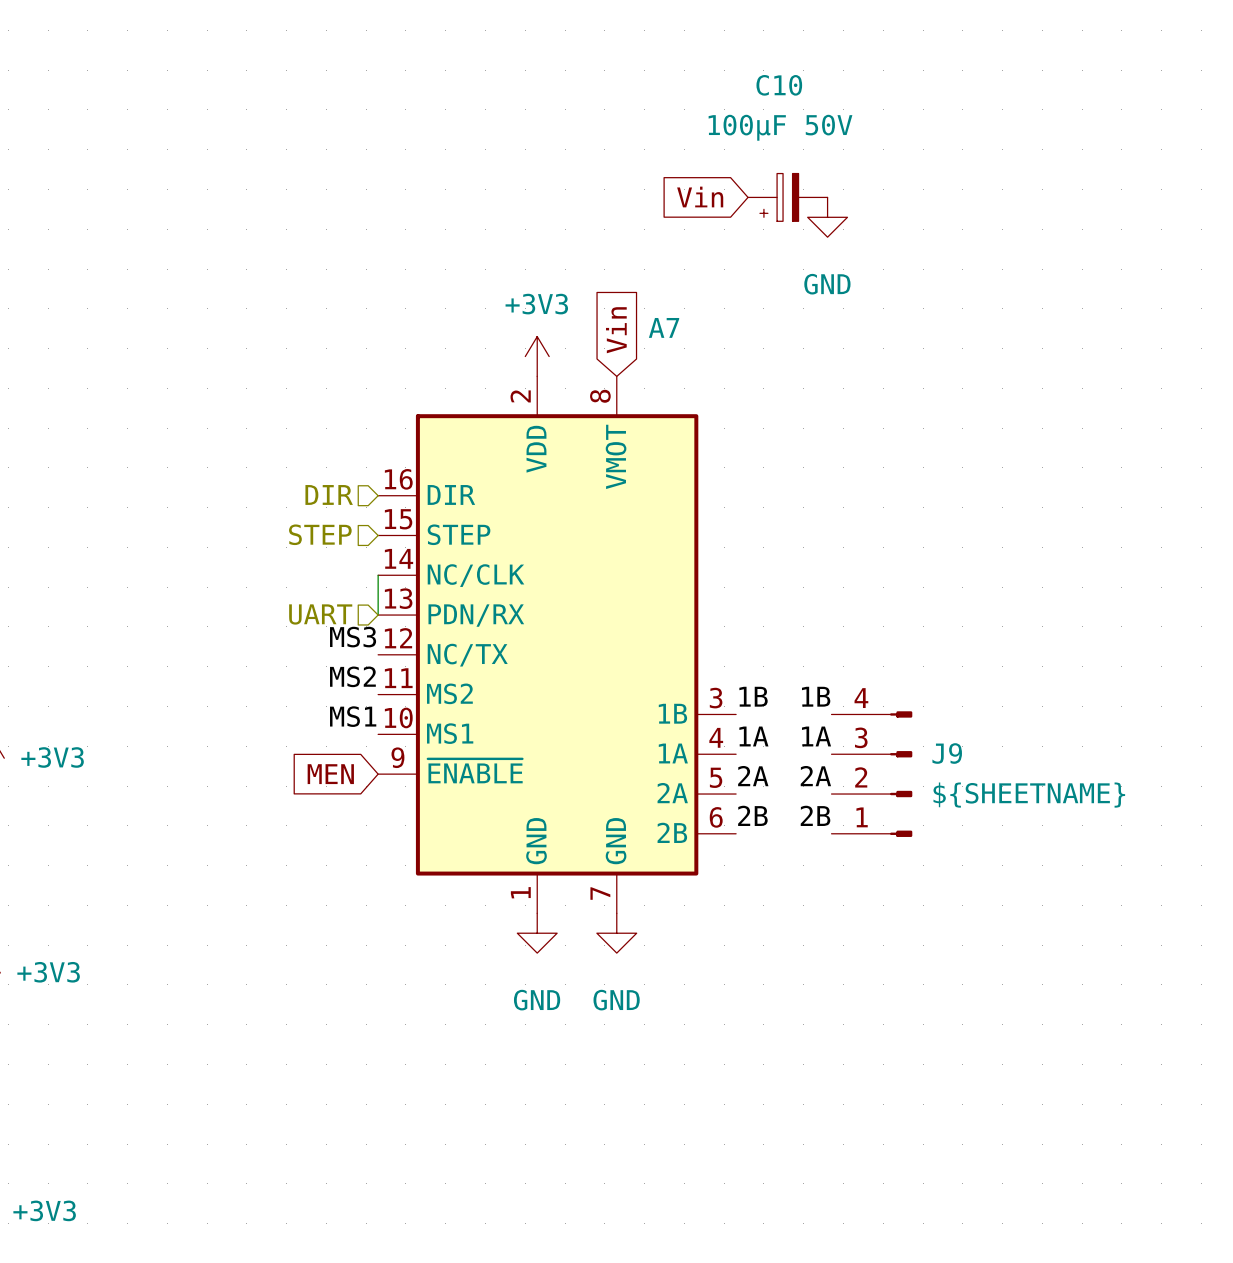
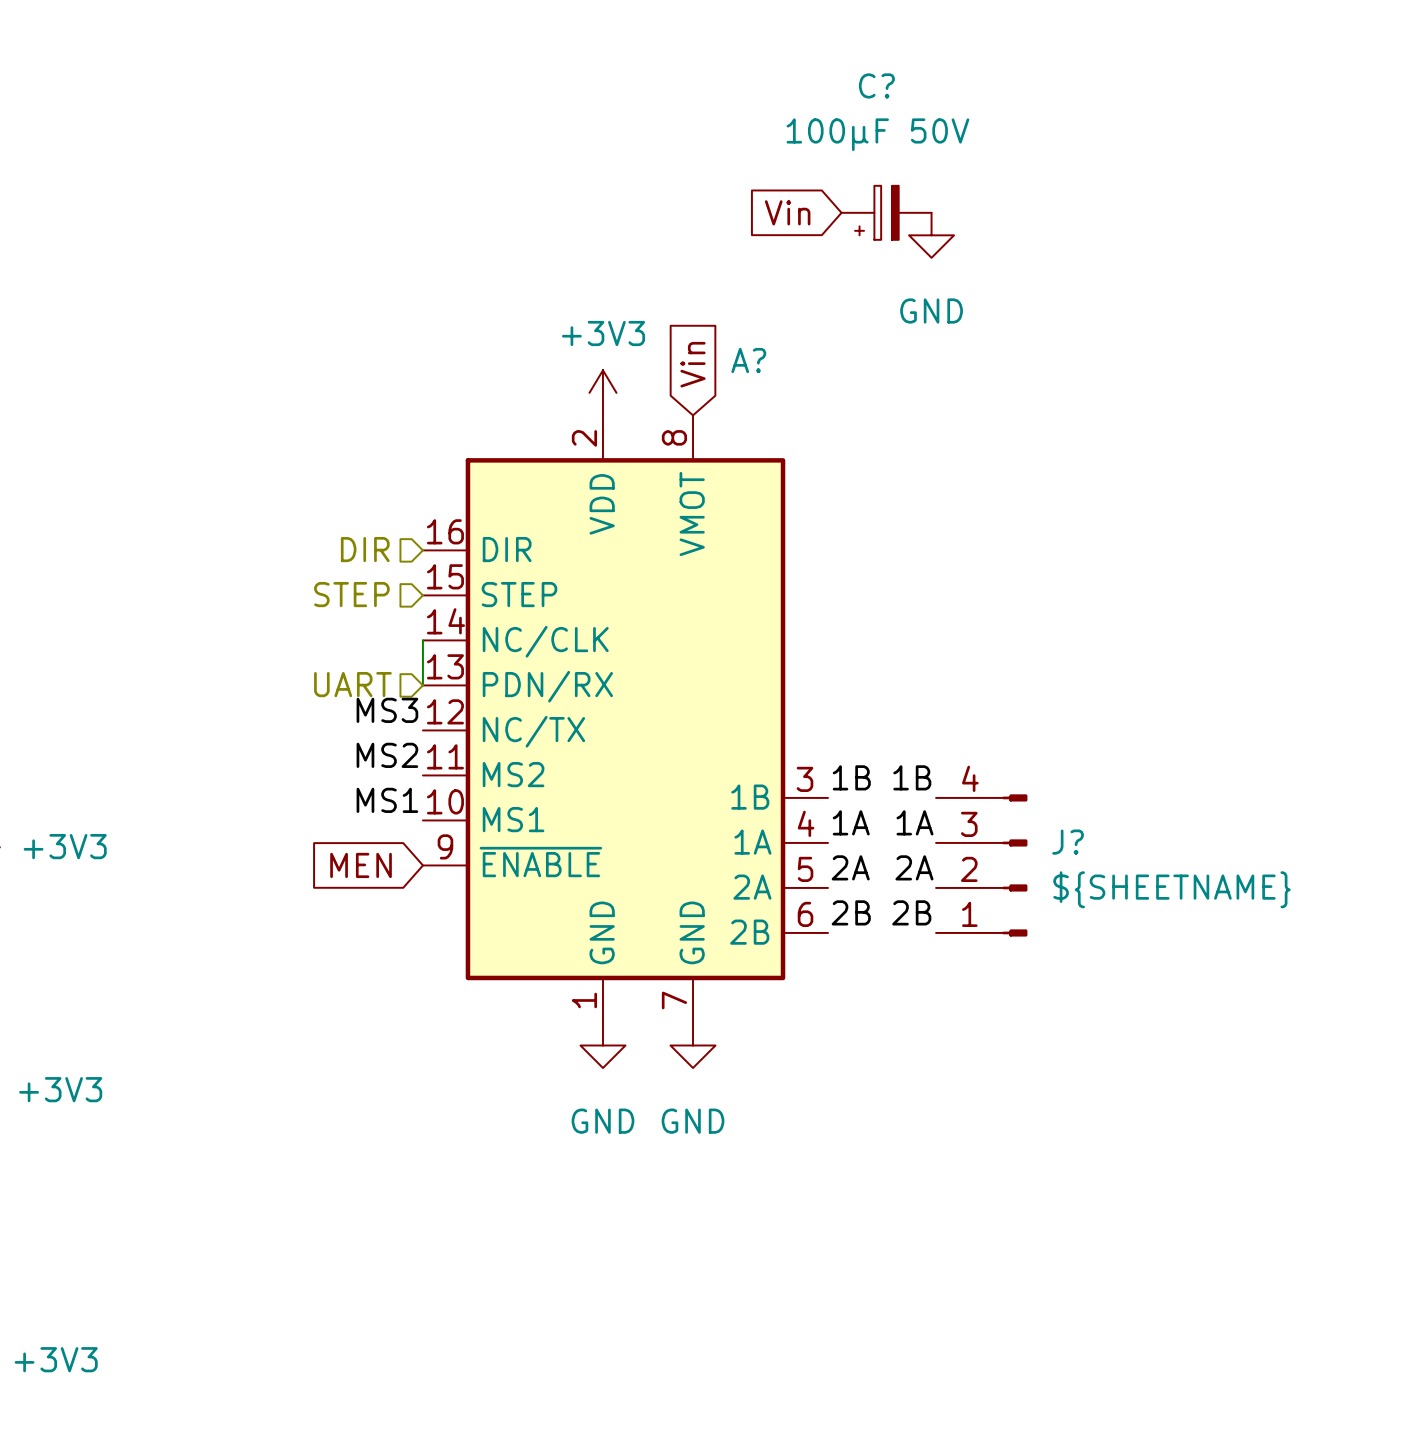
C10 name: C10 (779, 85) -> C? (876, 85)
A7 name: A7 (664, 327) -> A? (748, 360)
J9 name: J9 (947, 753) -> J? (1068, 842)

